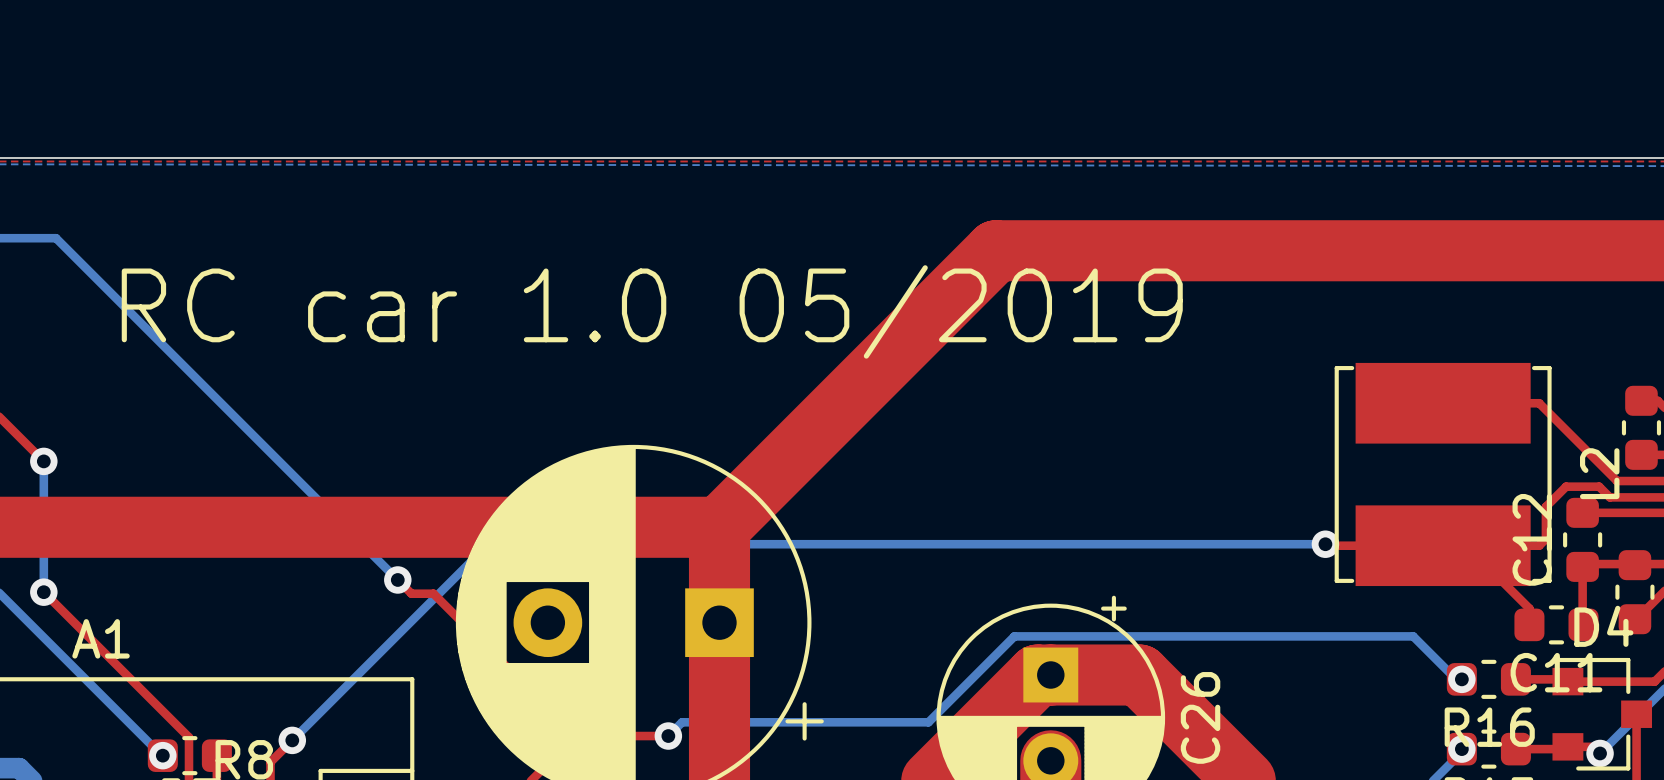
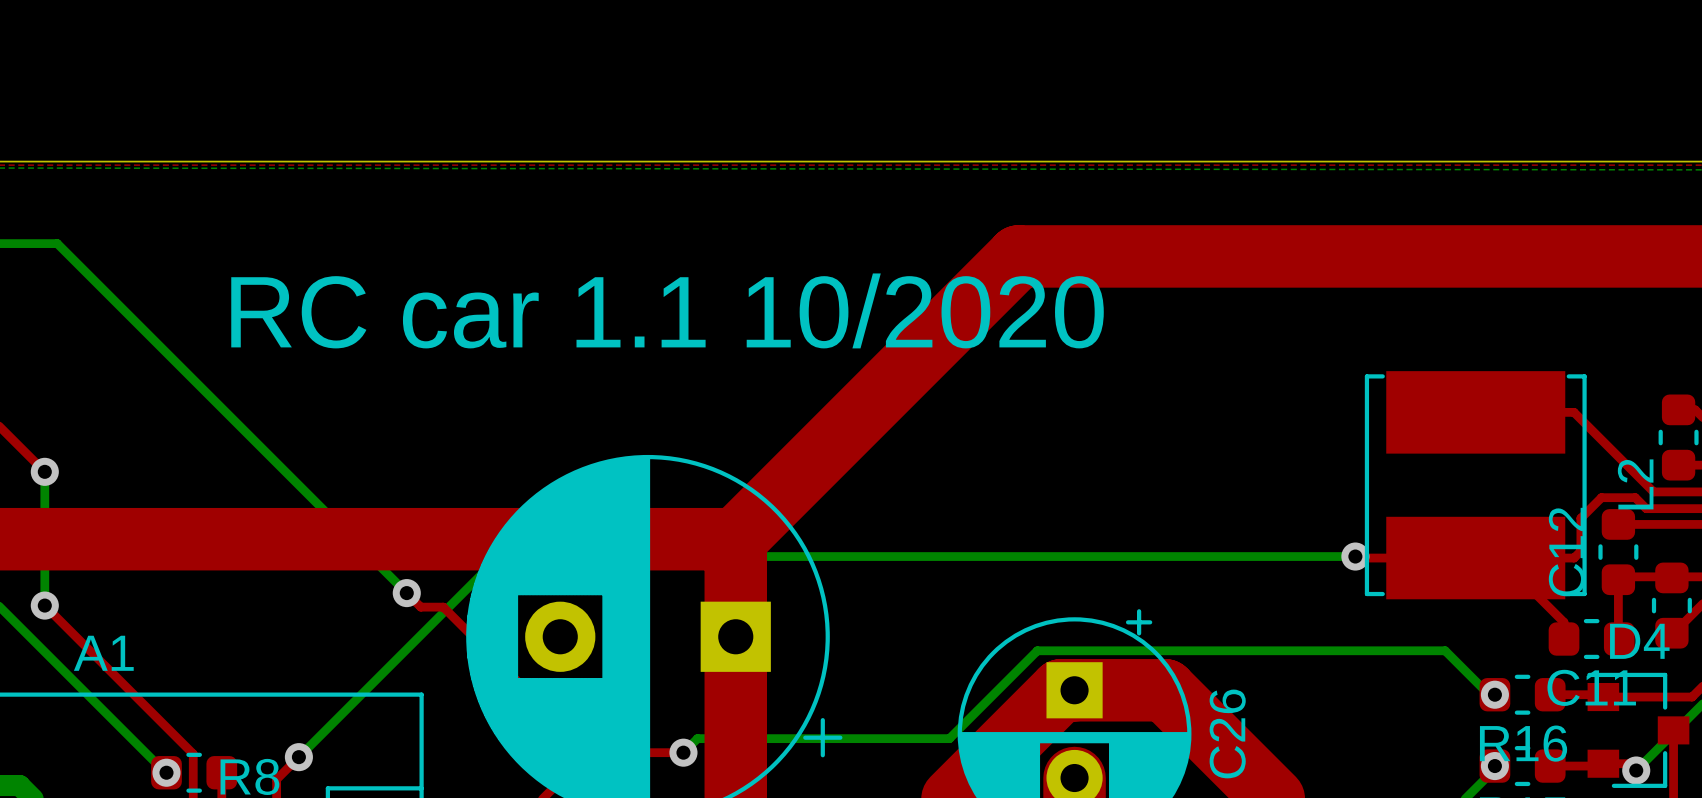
text: RC car 1.0 05/2019 (652, 311) -> RC car 1.1 10/2020 (667, 310)

